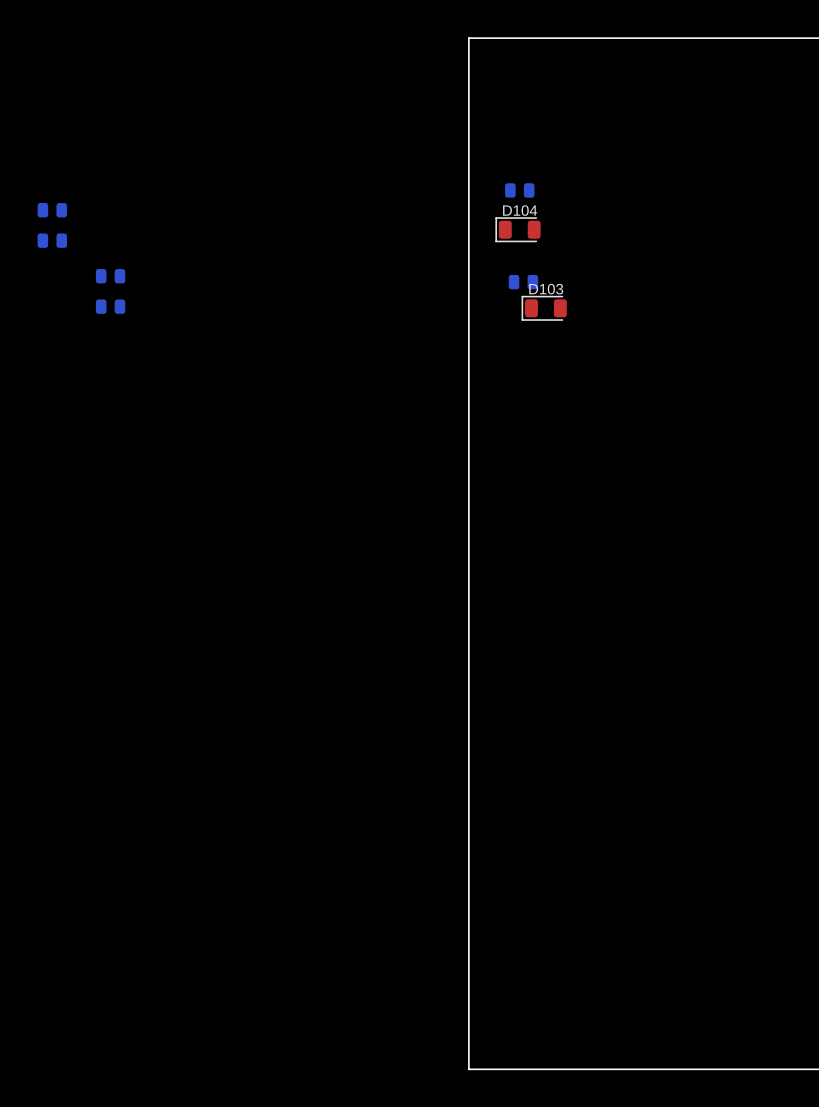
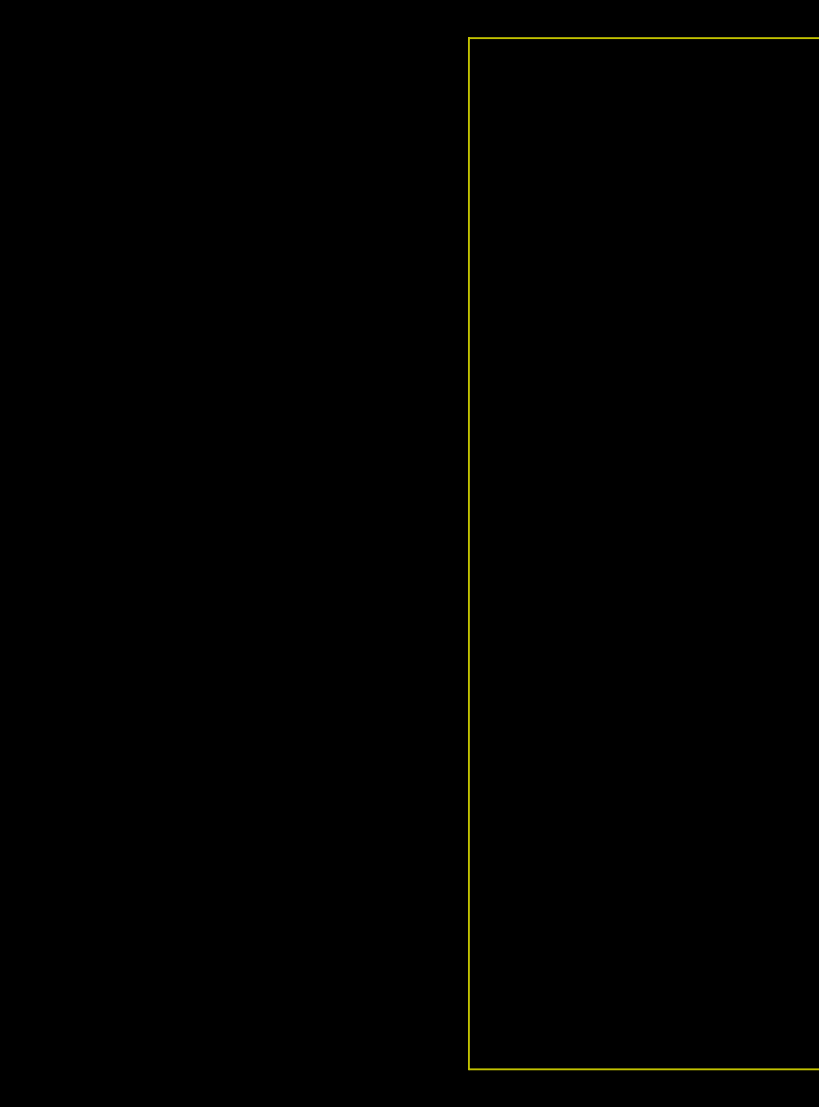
part: (519, 190) -> none
part: (52, 210) -> none
D104: (518, 229) -> none
part: (52, 240) -> none
part: (110, 276) -> none
part: (523, 282) -> none
part: (110, 306) -> none
D103: (544, 308) -> none

